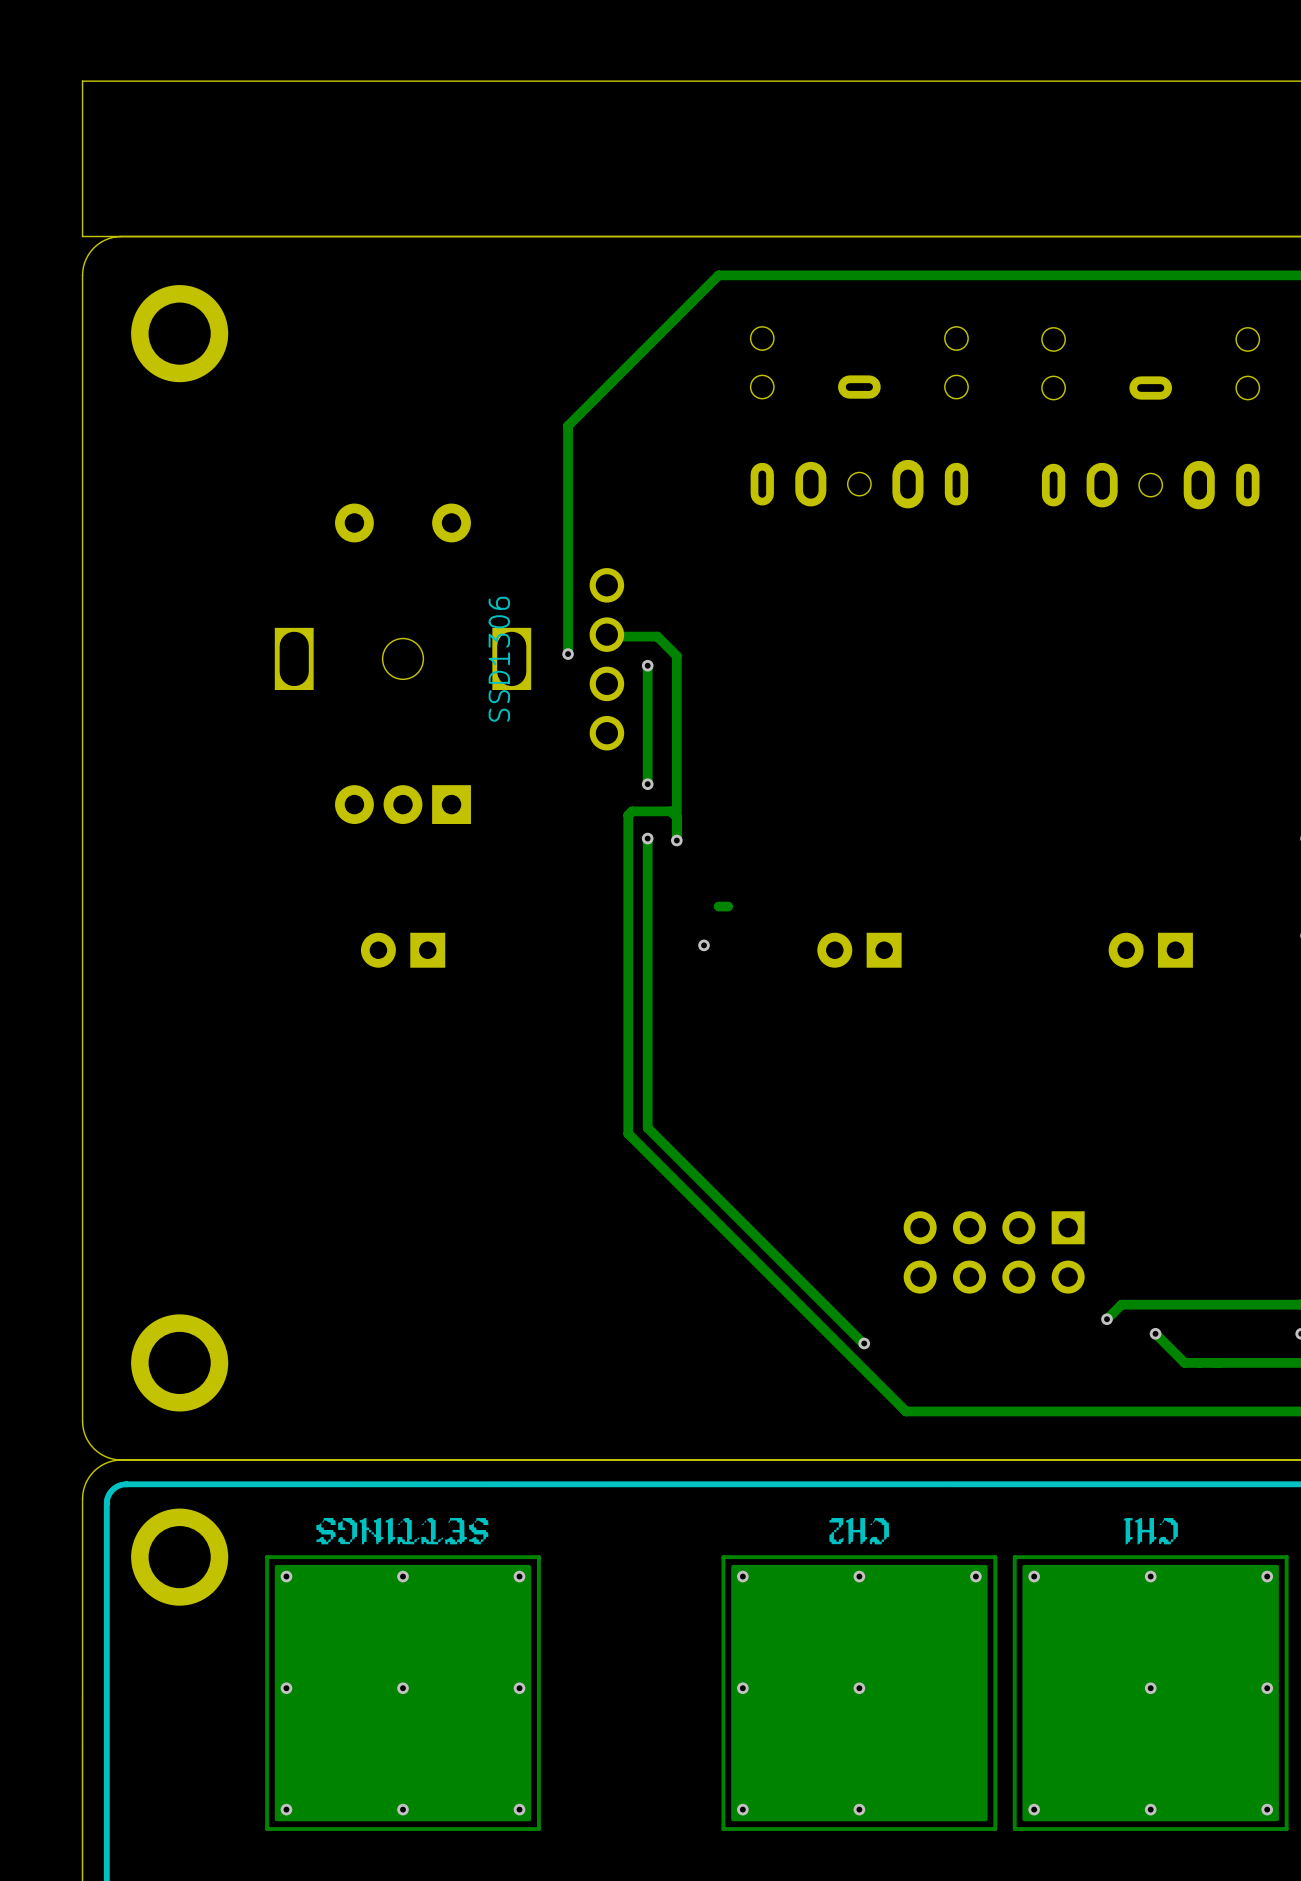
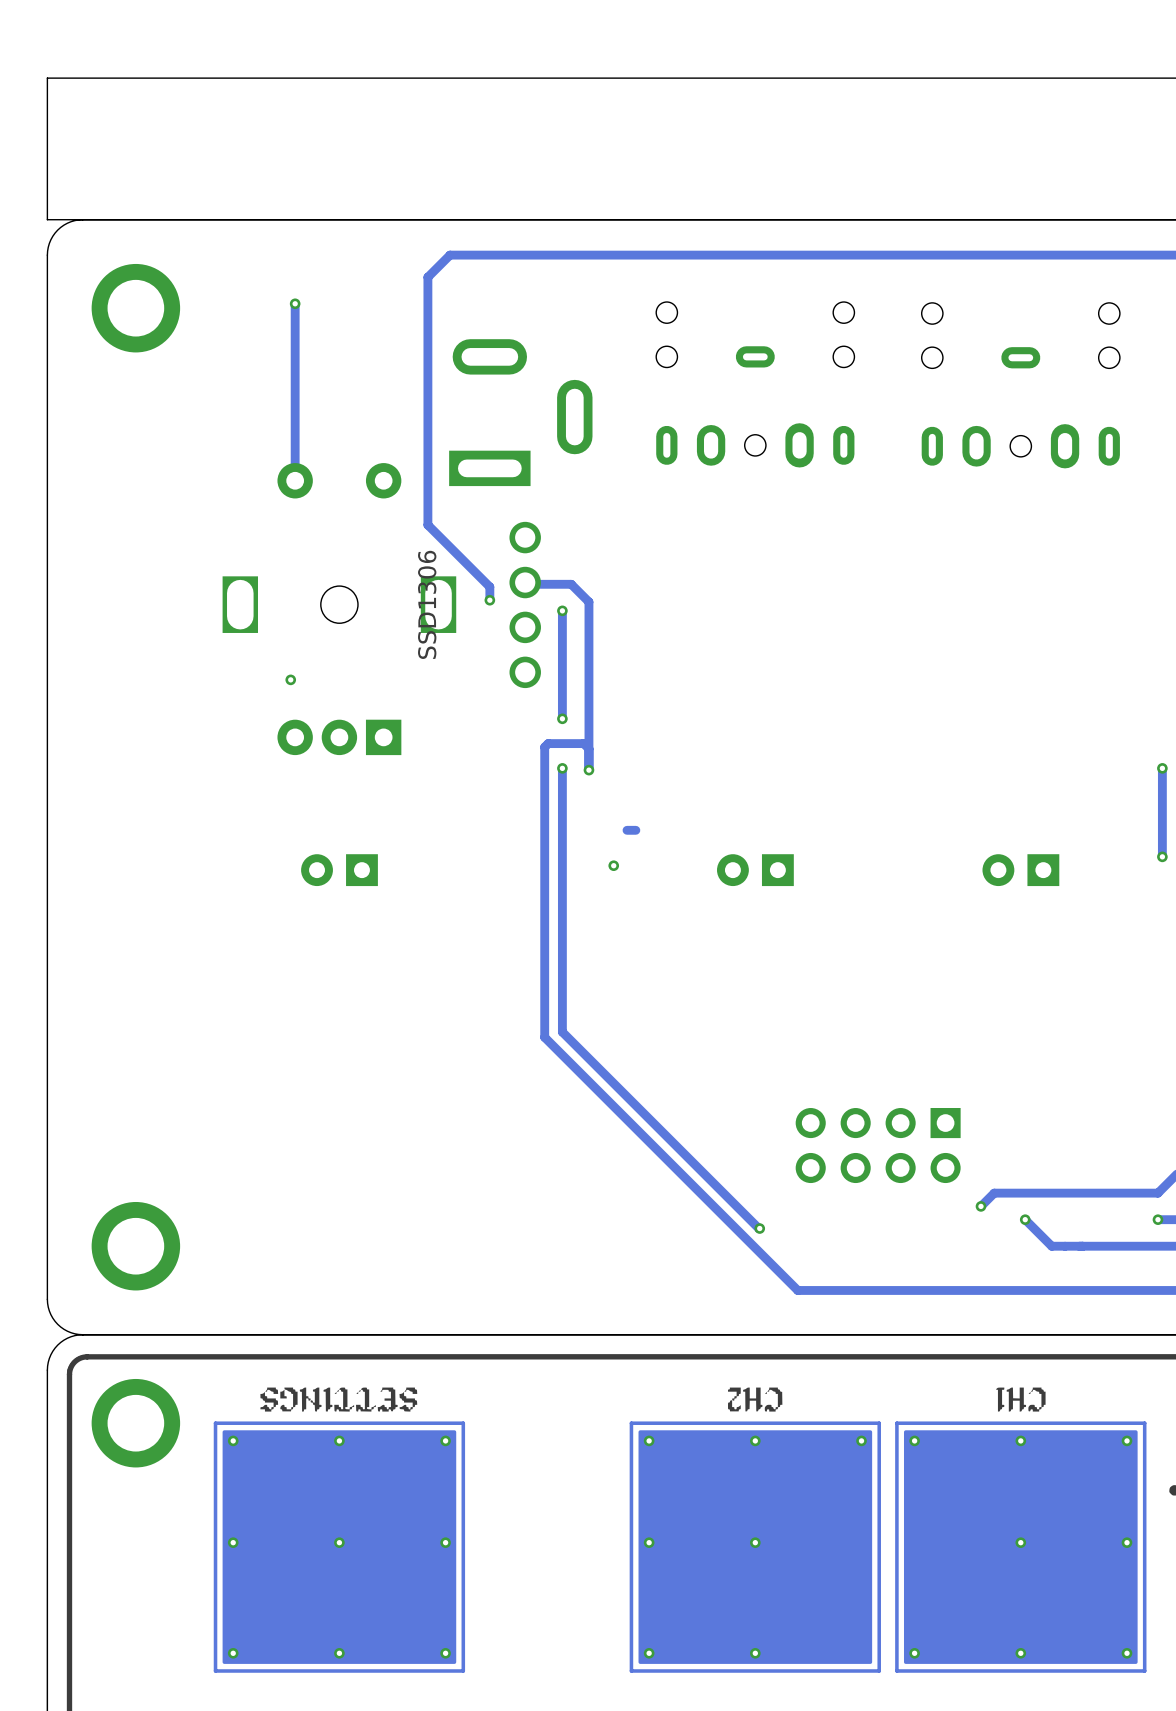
track: (718, 275) (568, 425) (568, 639) -> (627, 255) (450, 255) (427, 277) (427, 525) (489, 586)
track: none -> (295, 303) (295, 480)
via: none -> (295, 303)
part: none -> (520, 412)
via: none -> (290, 679)

